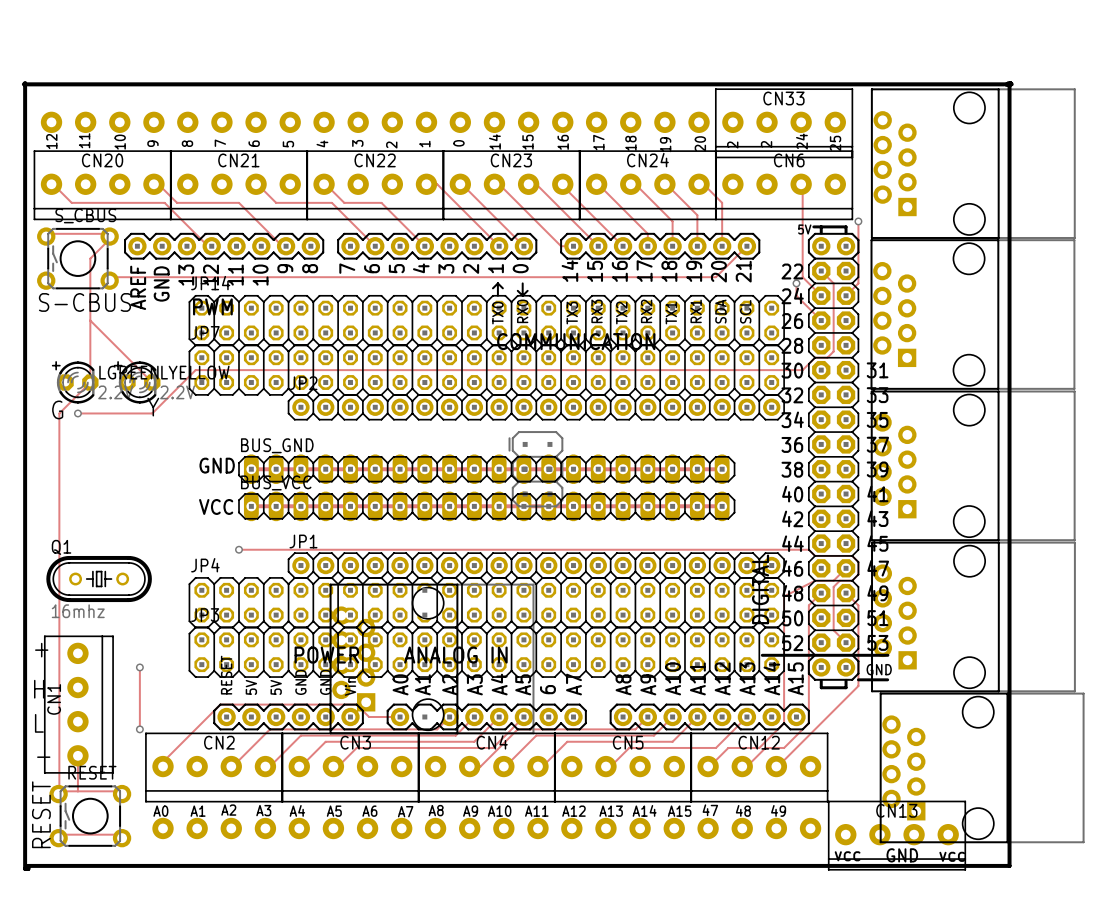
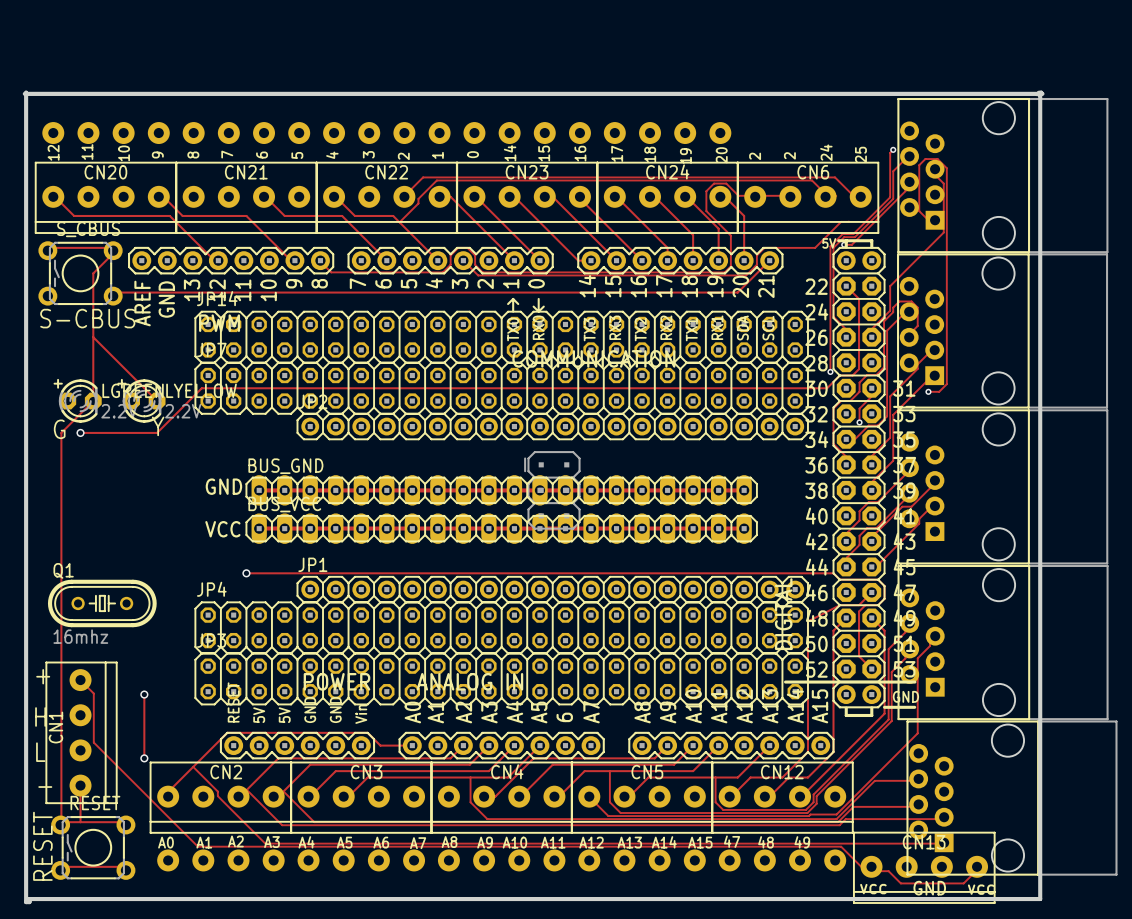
CN33: (784, 123) -> none
track: none -> (893, 149) (890, 152) (890, 197) (853, 234) (842, 234) (830, 246) (830, 371)
via: none -> (893, 149)
track: none -> (931, 170) (943, 183) (943, 232) (890, 286) (890, 310) (871, 329) (871, 337)
track: none -> (905, 183) (905, 191) (851, 244) (844, 244)
track: none -> (785, 196) (738, 195) (726, 183) (714, 183) (706, 191) (706, 211) (730, 235) (730, 266) (724, 272) (482, 272) (475, 264) (475, 255) (467, 247) (458, 247) (450, 255) (450, 264) (442, 272) (331, 272) (320, 260)
track: none -> (836, 196) (827, 195) (812, 180) (436, 180) (418, 198) (418, 203) (399, 222)
track: none -> (861, 196) (853, 195) (835, 177) (423, 177) (404, 196)
track: (801, 184) (802, 184) (802, 277) (821, 295) -> none
track: none -> (848, 221) (841, 221) (815, 247) (764, 247) (756, 255) (756, 264) (746, 275) (478, 275) (463, 260)
track: none -> (931, 221) (919, 211) (919, 165) (925, 159) (937, 159) (946, 168) (946, 384) (939, 391) (928, 391)
track: (858, 221) (858, 283) (846, 295) -> none
via: (858, 221) -> none
via: none -> (844, 244)
track: (796, 283) (796, 295) (820, 320) -> (905, 158) (893, 171) (893, 198) (854, 237) (844, 237) (833, 247) (833, 316) (845, 329) (845, 336)
via: (796, 283) -> none
track: none -> (905, 313) (887, 330) (887, 416) (877, 425) (868, 425) (854, 439) (846, 439)
track: none -> (905, 338) (917, 325) (917, 307) (911, 301) (899, 301) (893, 307) (893, 312) (884, 321) (884, 367) (876, 374) (867, 374) (859, 382) (859, 391) (850, 401) (841, 401) (833, 408) (833, 443) (845, 456) (846, 464)
track: none -> (931, 351) (917, 364) (917, 368) (890, 396) (890, 437) (871, 456) (871, 464)
via: none -> (830, 371)
track: none -> (931, 377) (893, 414) (893, 460) (871, 482) (871, 490)
track: none -> (871, 388) (871, 396) (859, 408) (859, 422)
via: none -> (928, 391)
via: none -> (859, 422)
track: none -> (905, 469) (905, 474) (877, 502) (868, 502) (859, 511) (859, 520) (847, 532) (846, 541)
track: none -> (931, 481) (929, 488) (911, 506) (902, 506) (871, 537) (871, 541)
track: none -> (905, 494) (905, 499) (876, 528) (867, 528) (859, 535) (859, 544) (847, 557) (846, 566)
track: none -> (931, 507) (919, 518) (919, 523) (876, 566) (871, 566)
track: none -> (905, 624) (905, 632) (888, 649) (888, 719) (813, 794) (813, 802) (805, 809) (723, 809) (715, 802) (715, 777)
track: none -> (931, 637) (929, 646) (917, 658) (917, 733) (836, 814) (608, 816) (589, 796)
track: none -> (905, 650) (905, 658) (891, 672) (891, 721) (816, 796) (816, 803) (807, 812) (620, 812) (609, 802) (609, 771)
track: none -> (80, 680) (93, 693) (93, 742) (197, 846) (841, 846) (864, 869) (888, 871) (900, 883) (963, 883) (977, 870)
part: (432, 658) -> none
track: none -> (193, 766) (217, 791) (217, 796) (265, 843) (940, 843)
track: none -> (470, 777) (470, 802) (487, 819) (836, 819) (874, 780) (914, 779)
track: none -> (238, 796) (246, 790) (282, 825) (839, 825) (845, 819) (940, 818)
track: none -> (273, 796) (283, 791) (314, 822) (838, 822) (853, 806) (914, 805)

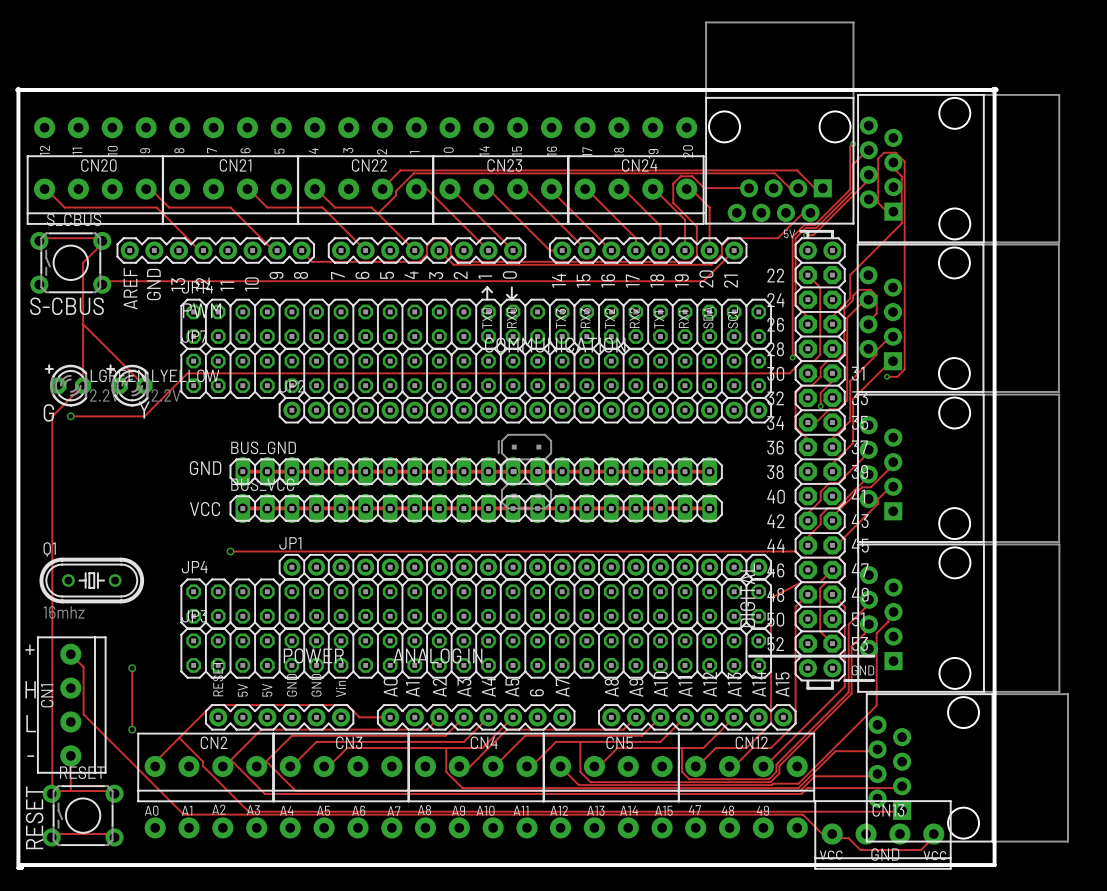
part: none -> (779, 123)
text: 24 (826, 152) -> none
text: 25 (860, 154) -> none
text: 2 (789, 155) -> none
text: 2 (755, 156) -> none
CN6: (807, 197) -> none

